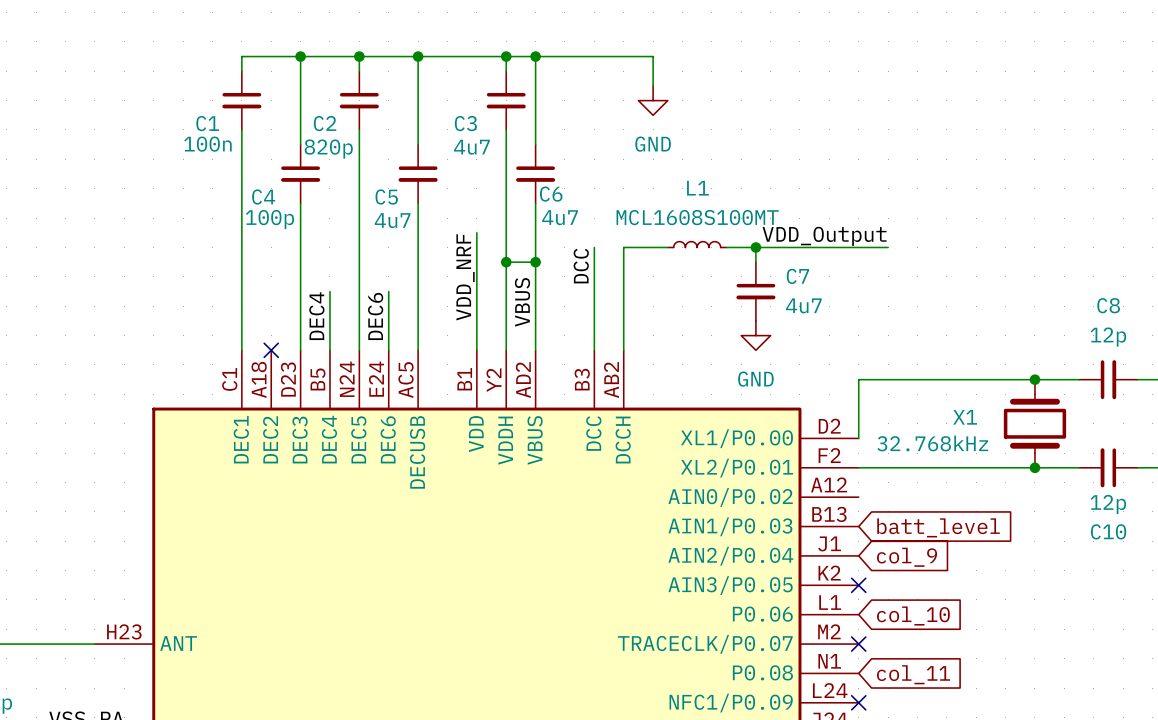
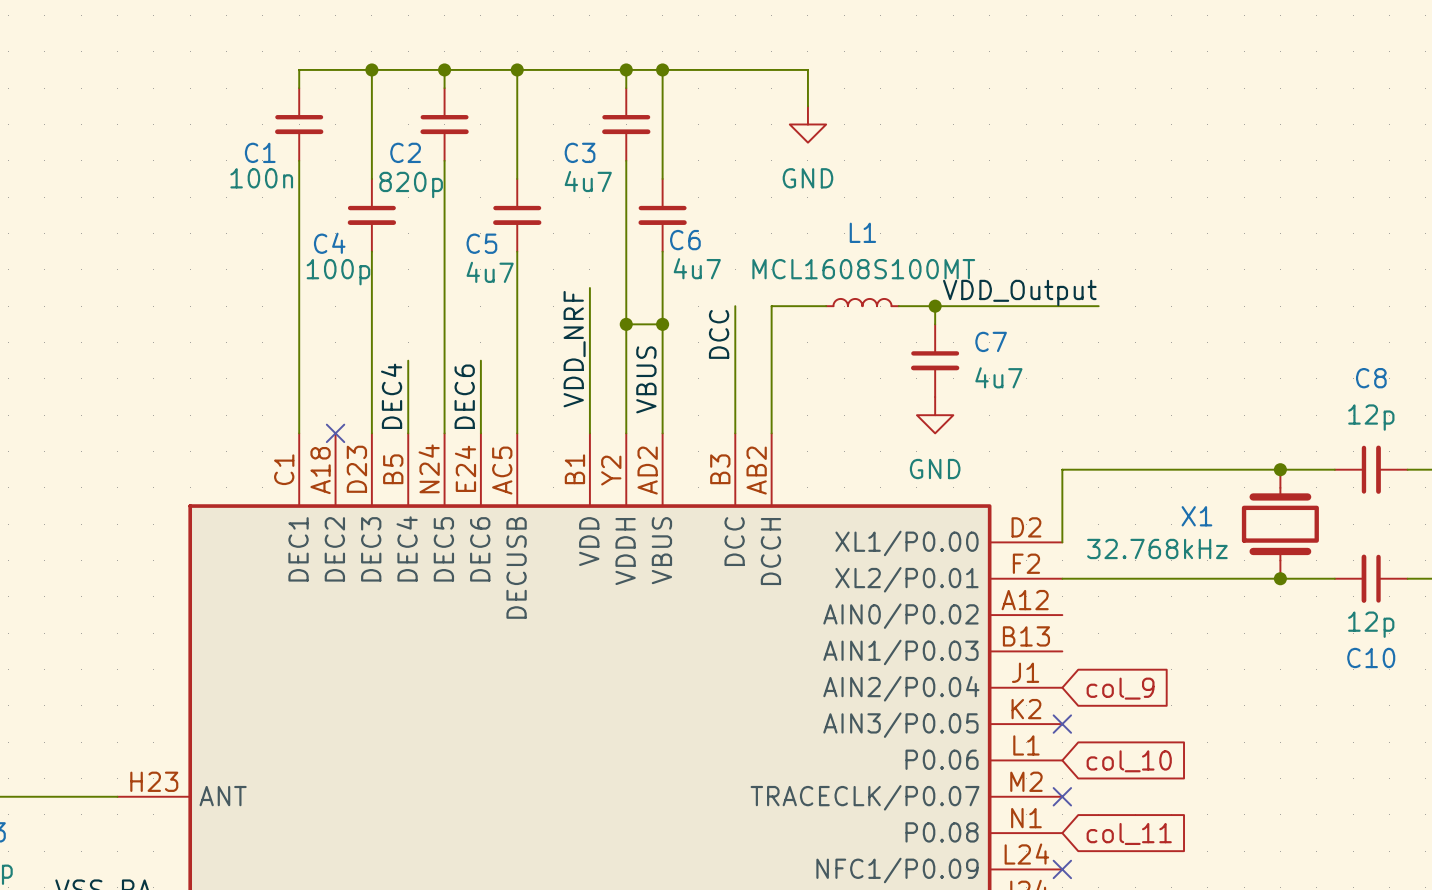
global label: batt_level (938, 527) -> none

